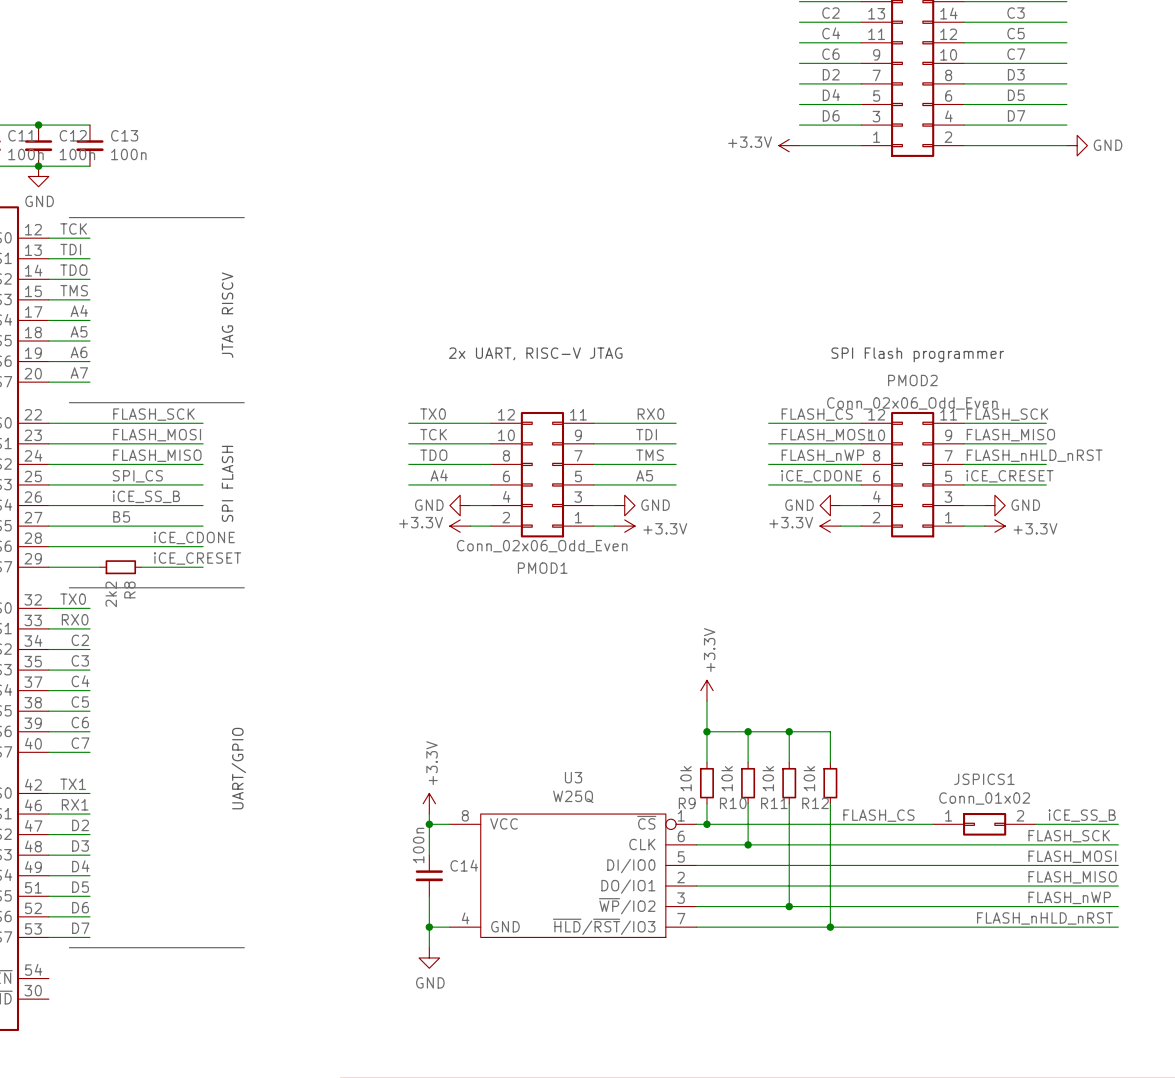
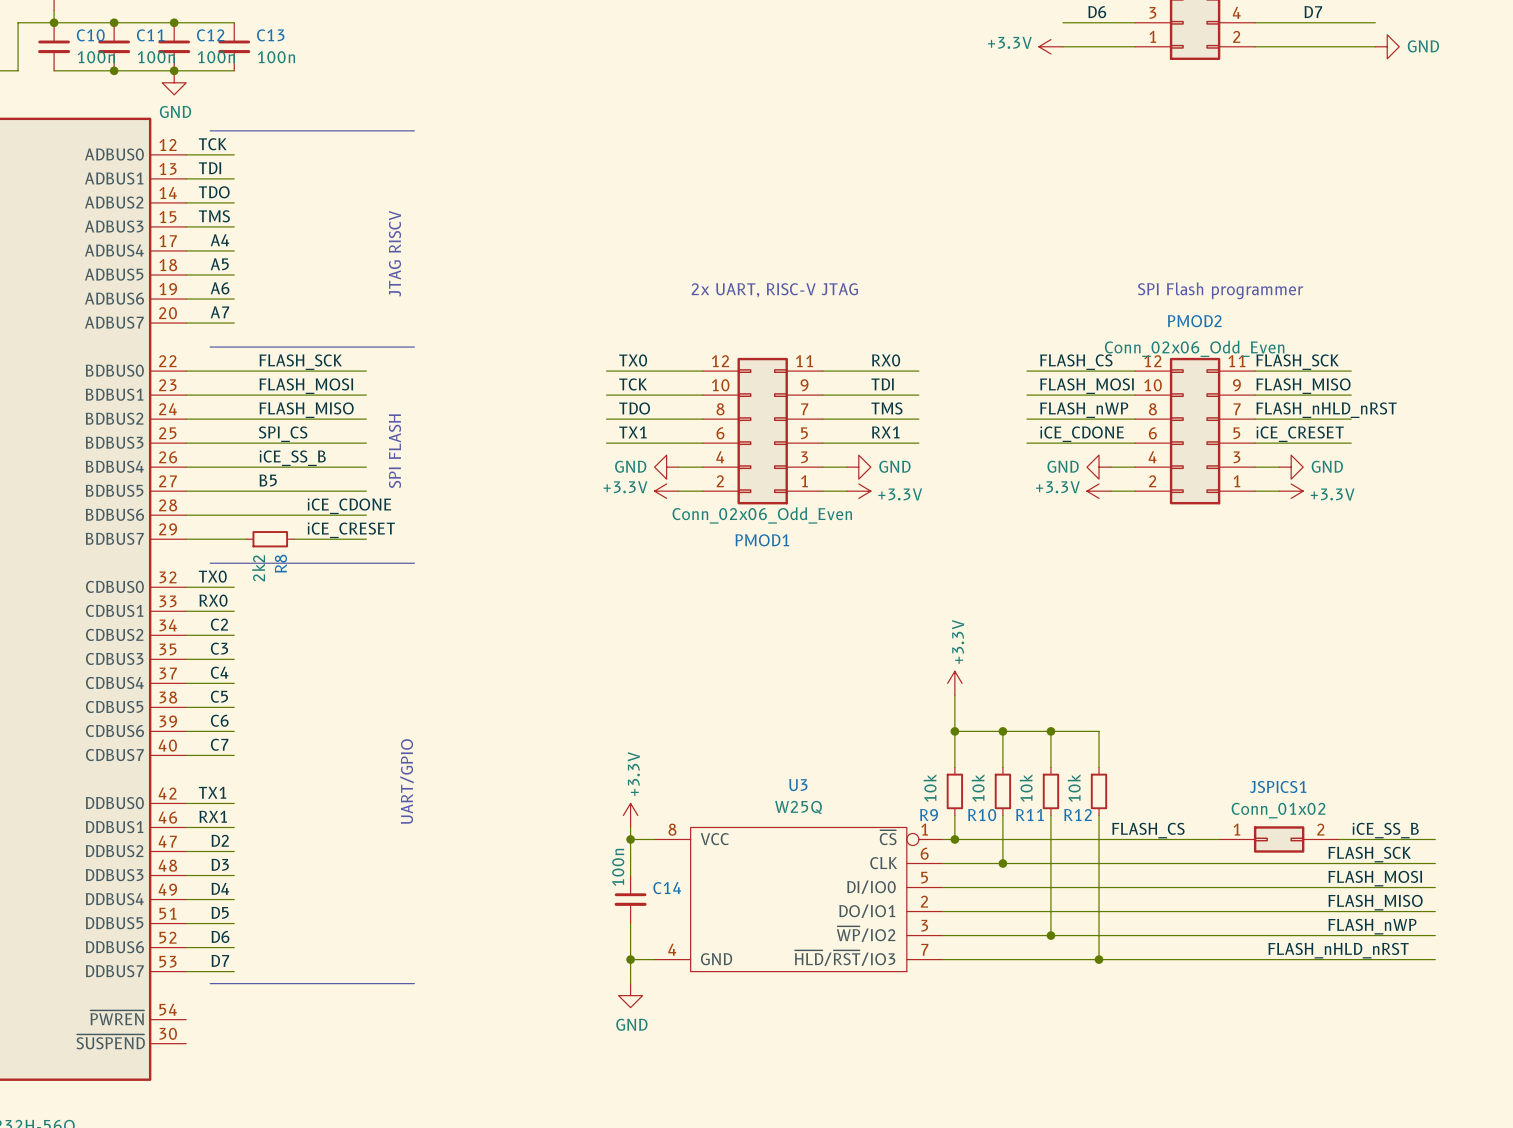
label: none -> TX1 (632, 432)
label: A4 (439, 475) -> none
label: A5 (644, 475) -> RX1 (885, 432)

